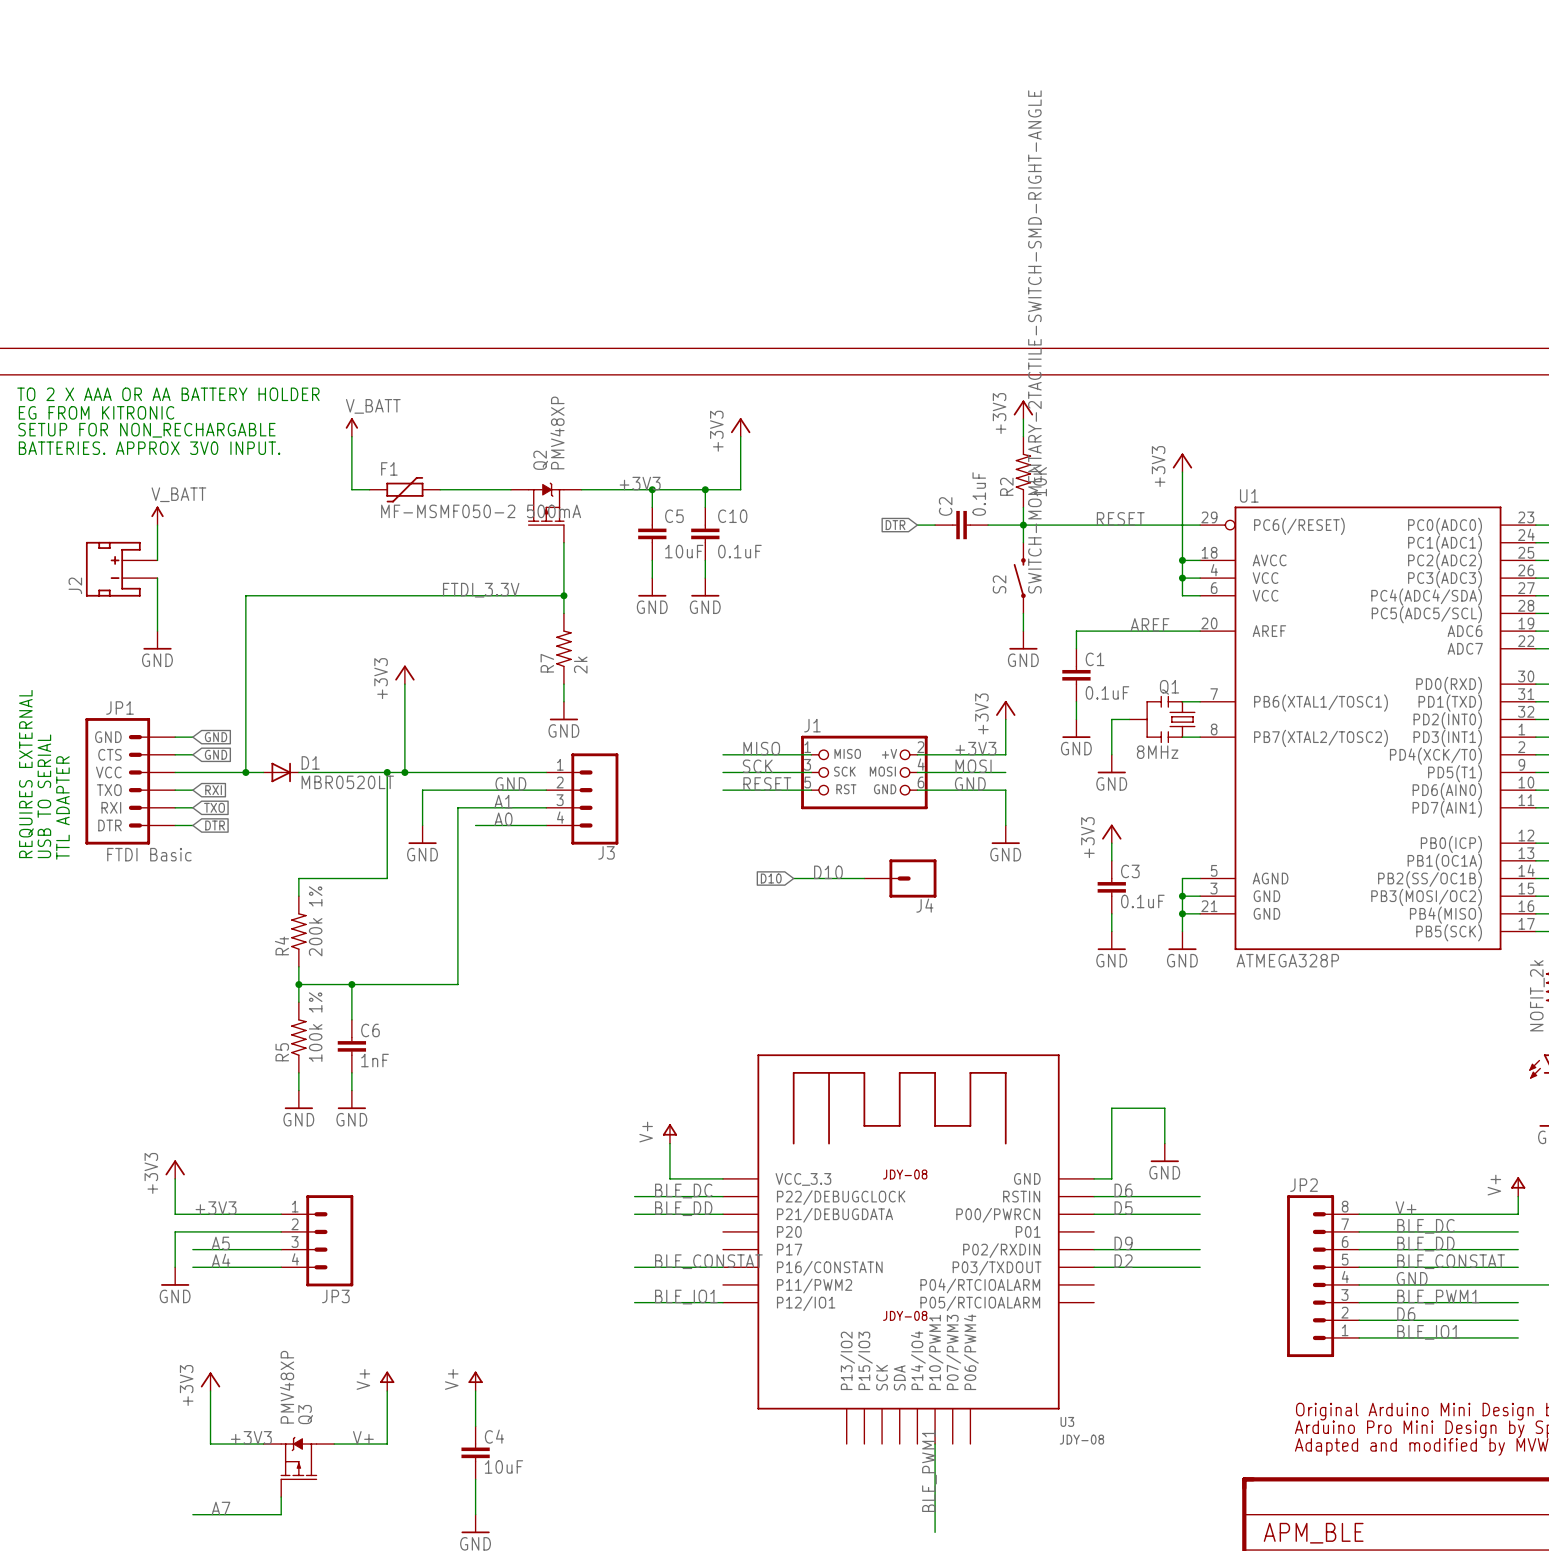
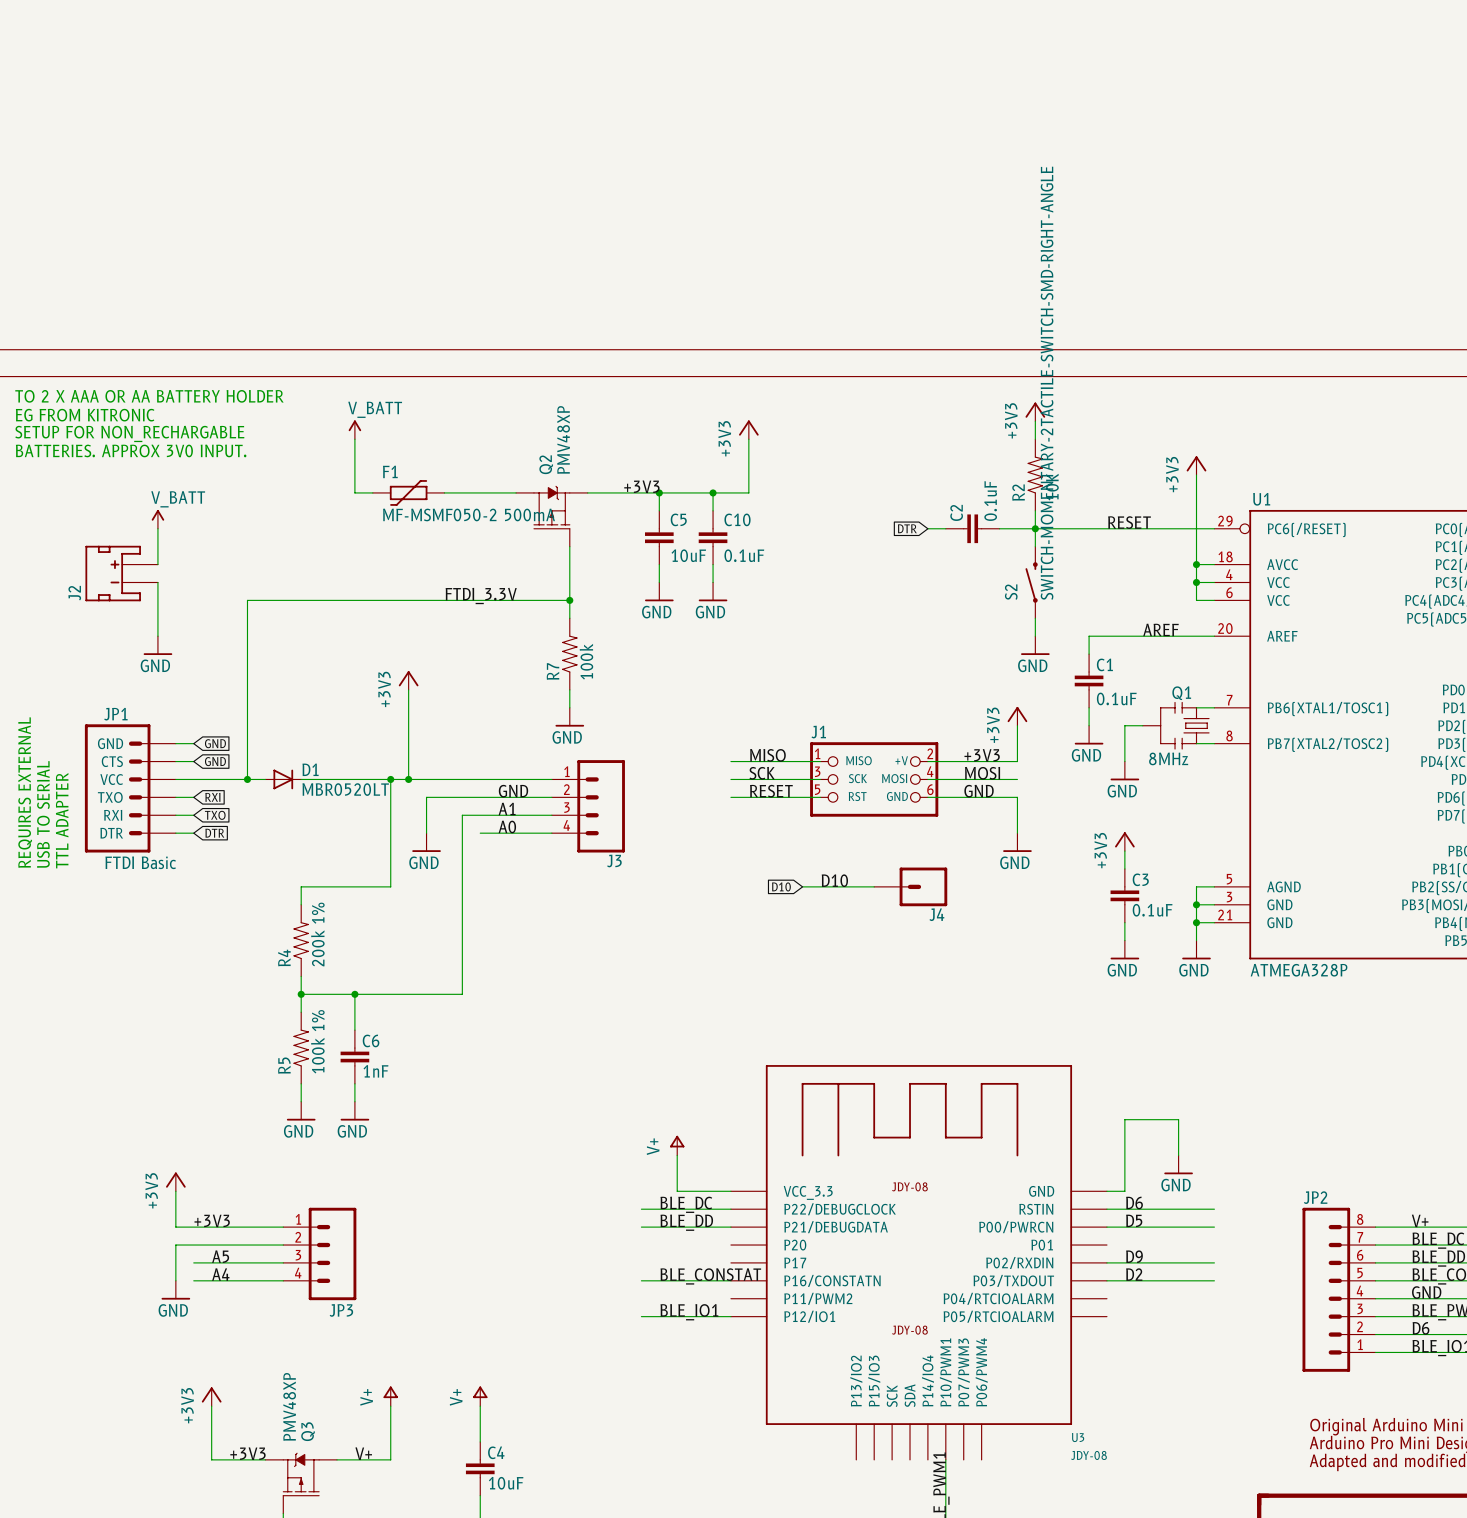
R7 value: 2k (580, 665) -> 100k (586, 661)

